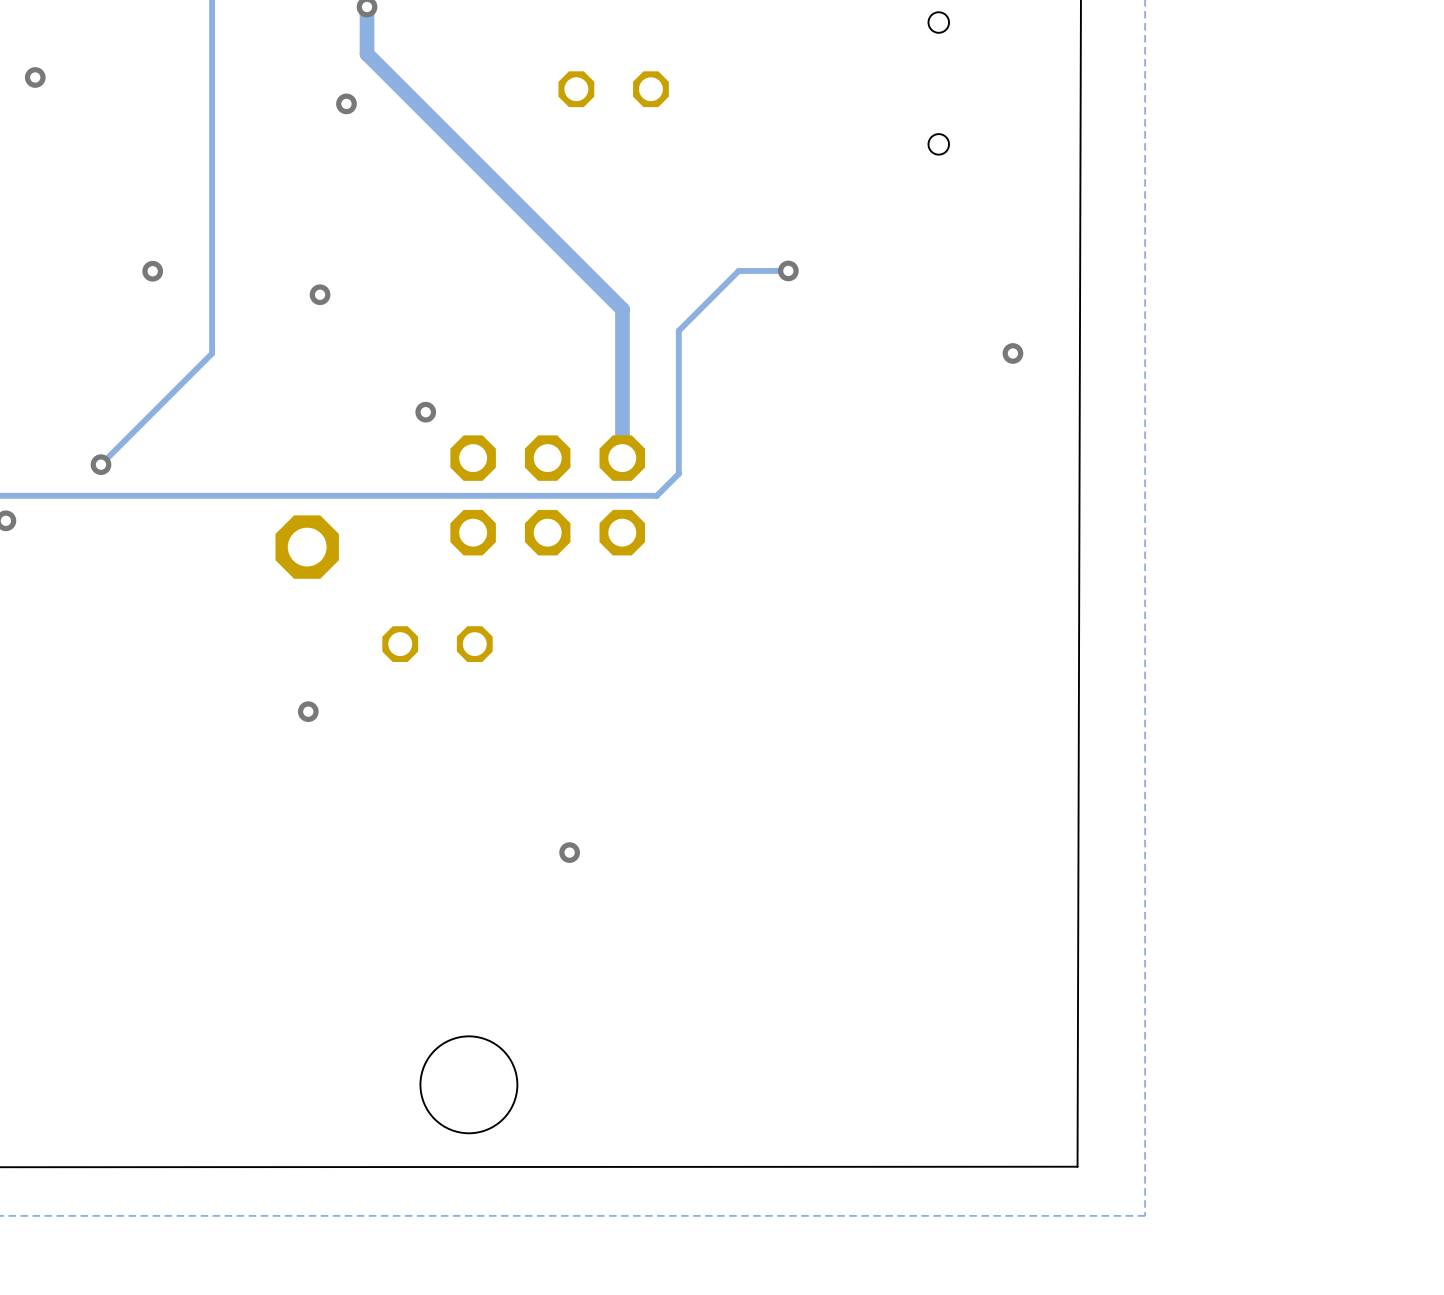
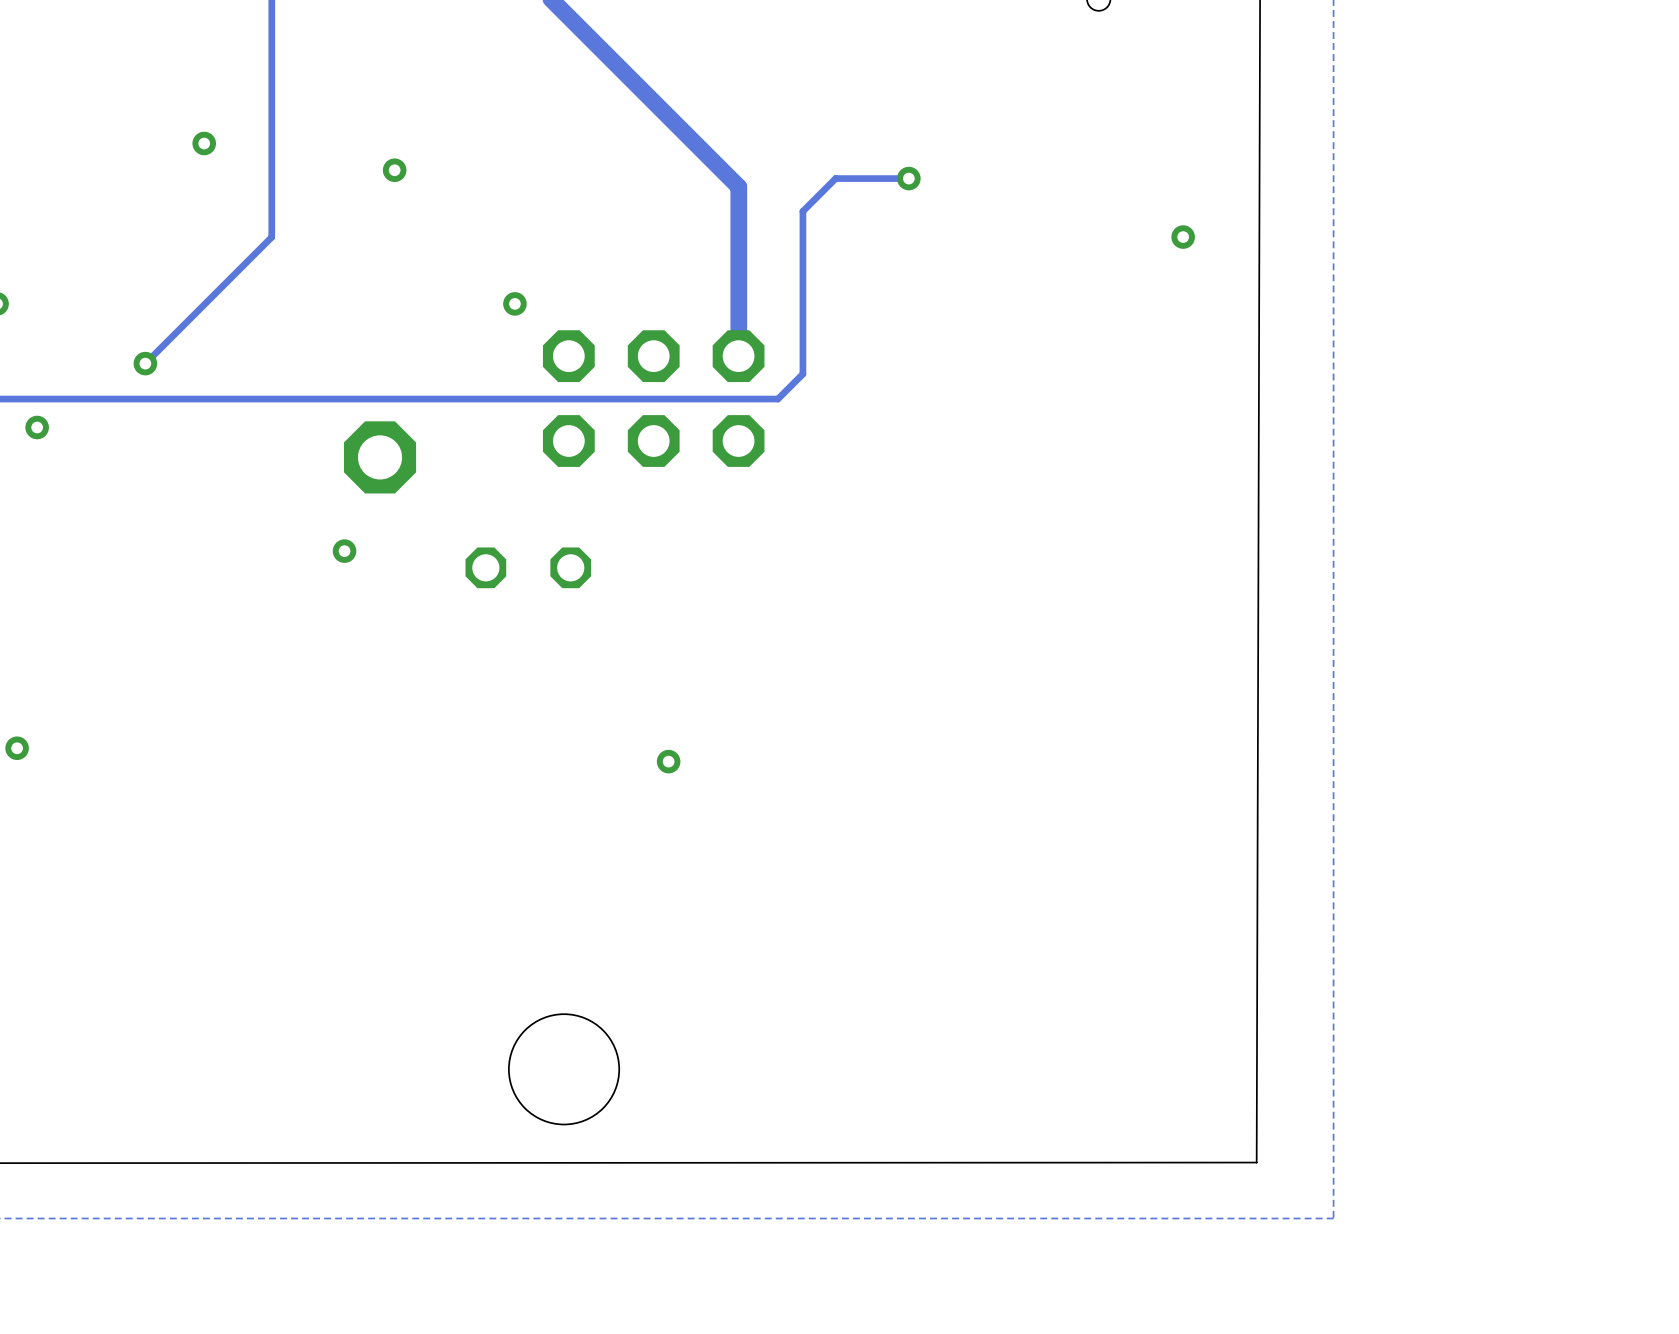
track: (788, 270) (738, 270) (707, 302) -> (908, 178) (835, 178)
via position: (788, 270) -> (908, 178)
via position: (308, 711) -> (344, 551)
via position: (569, 852) -> (668, 761)

